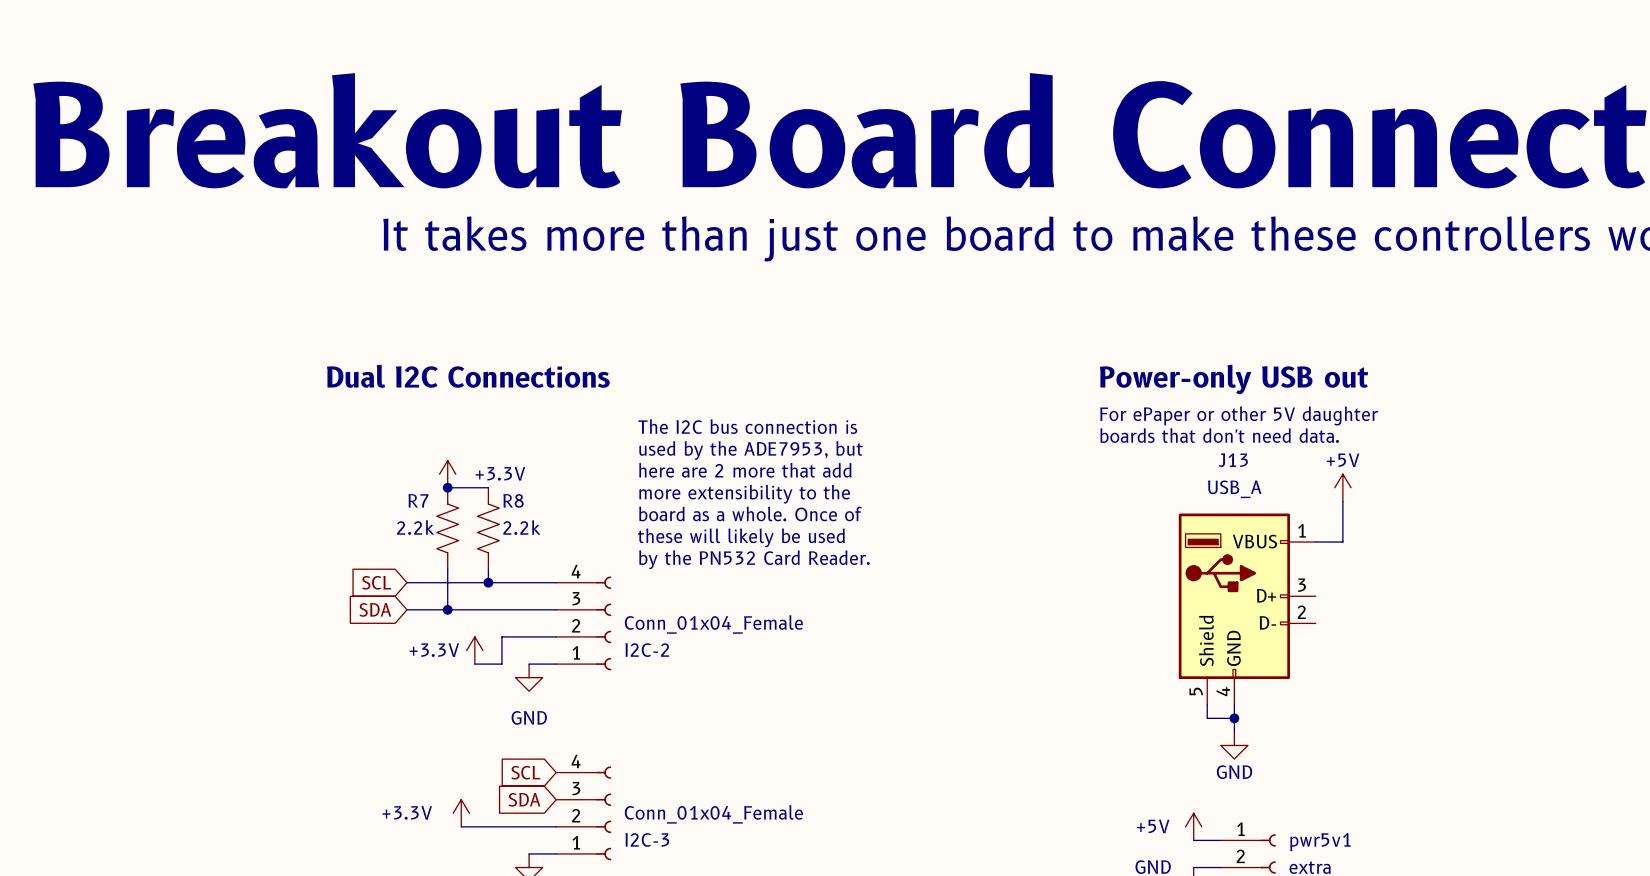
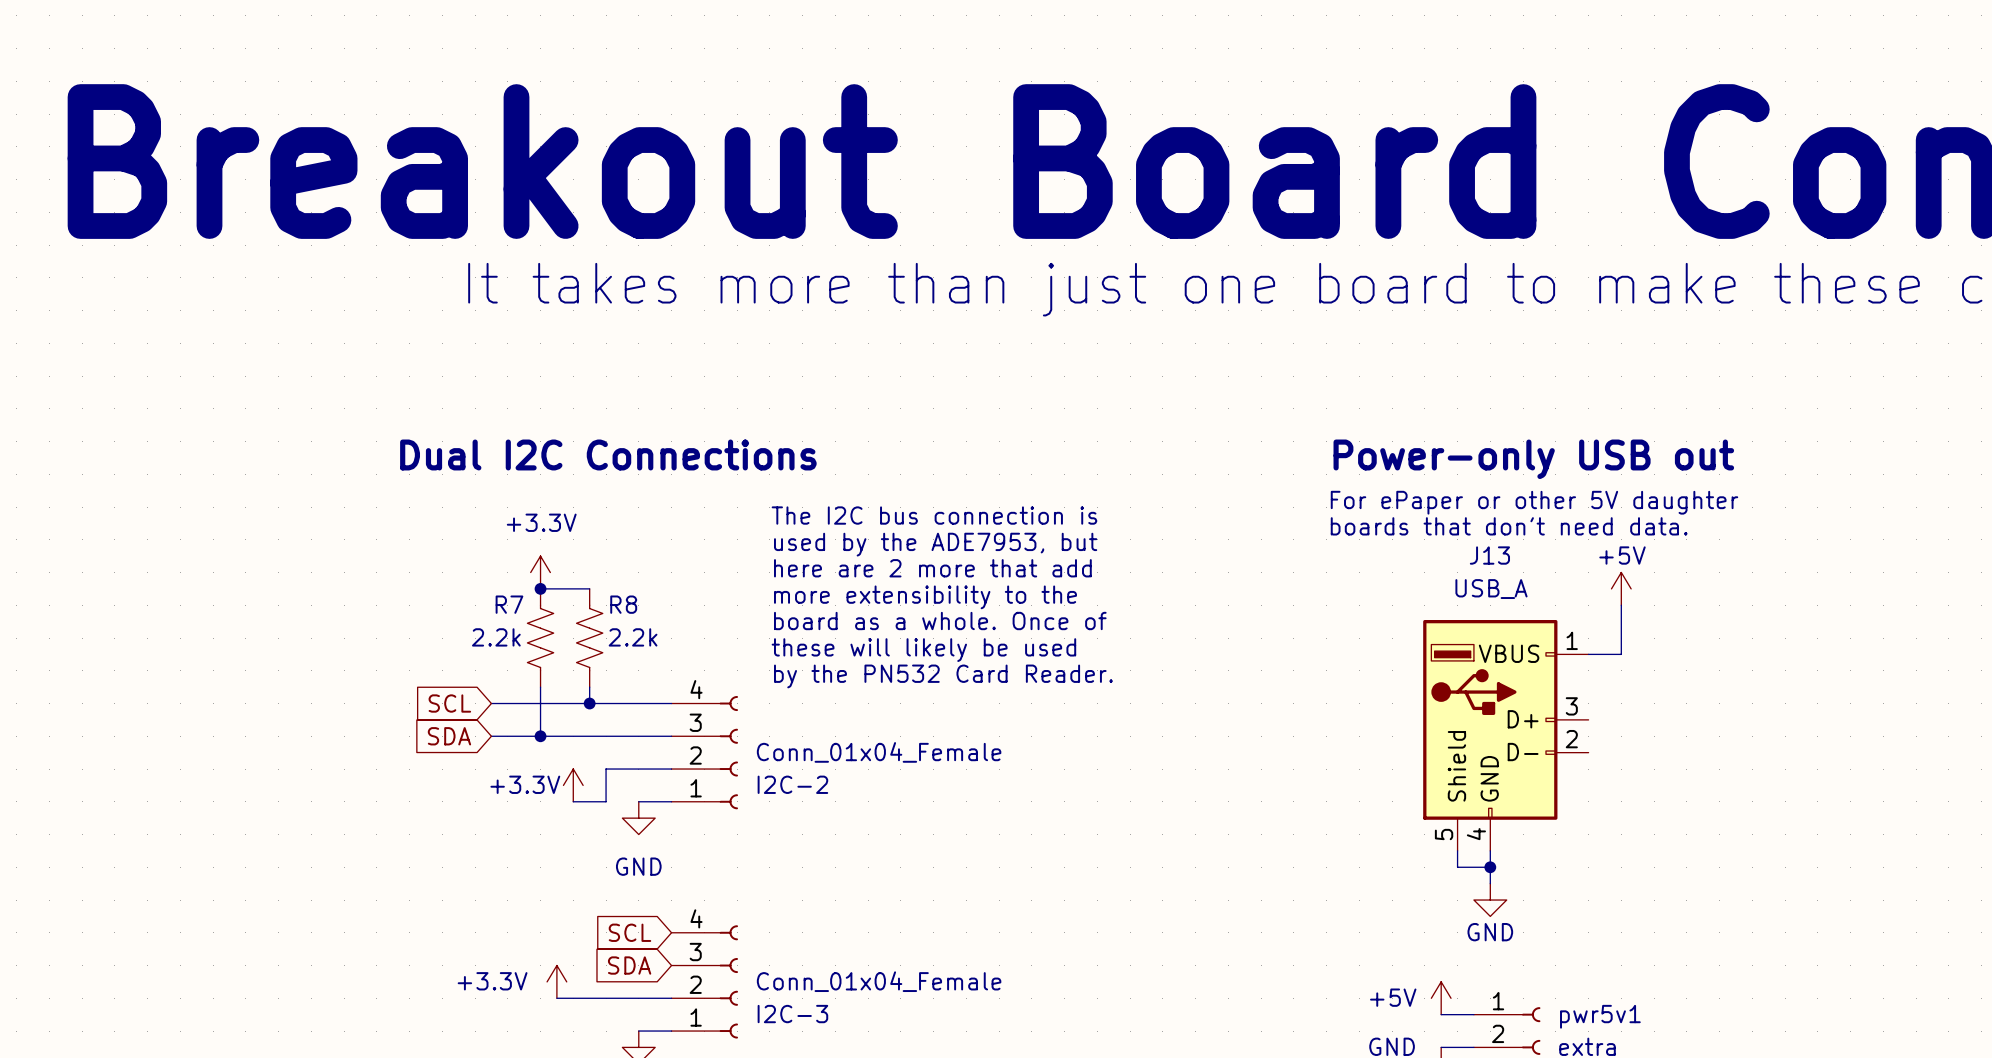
power symbol text position: +3.3V (500, 473) -> +3.3V (541, 522)

